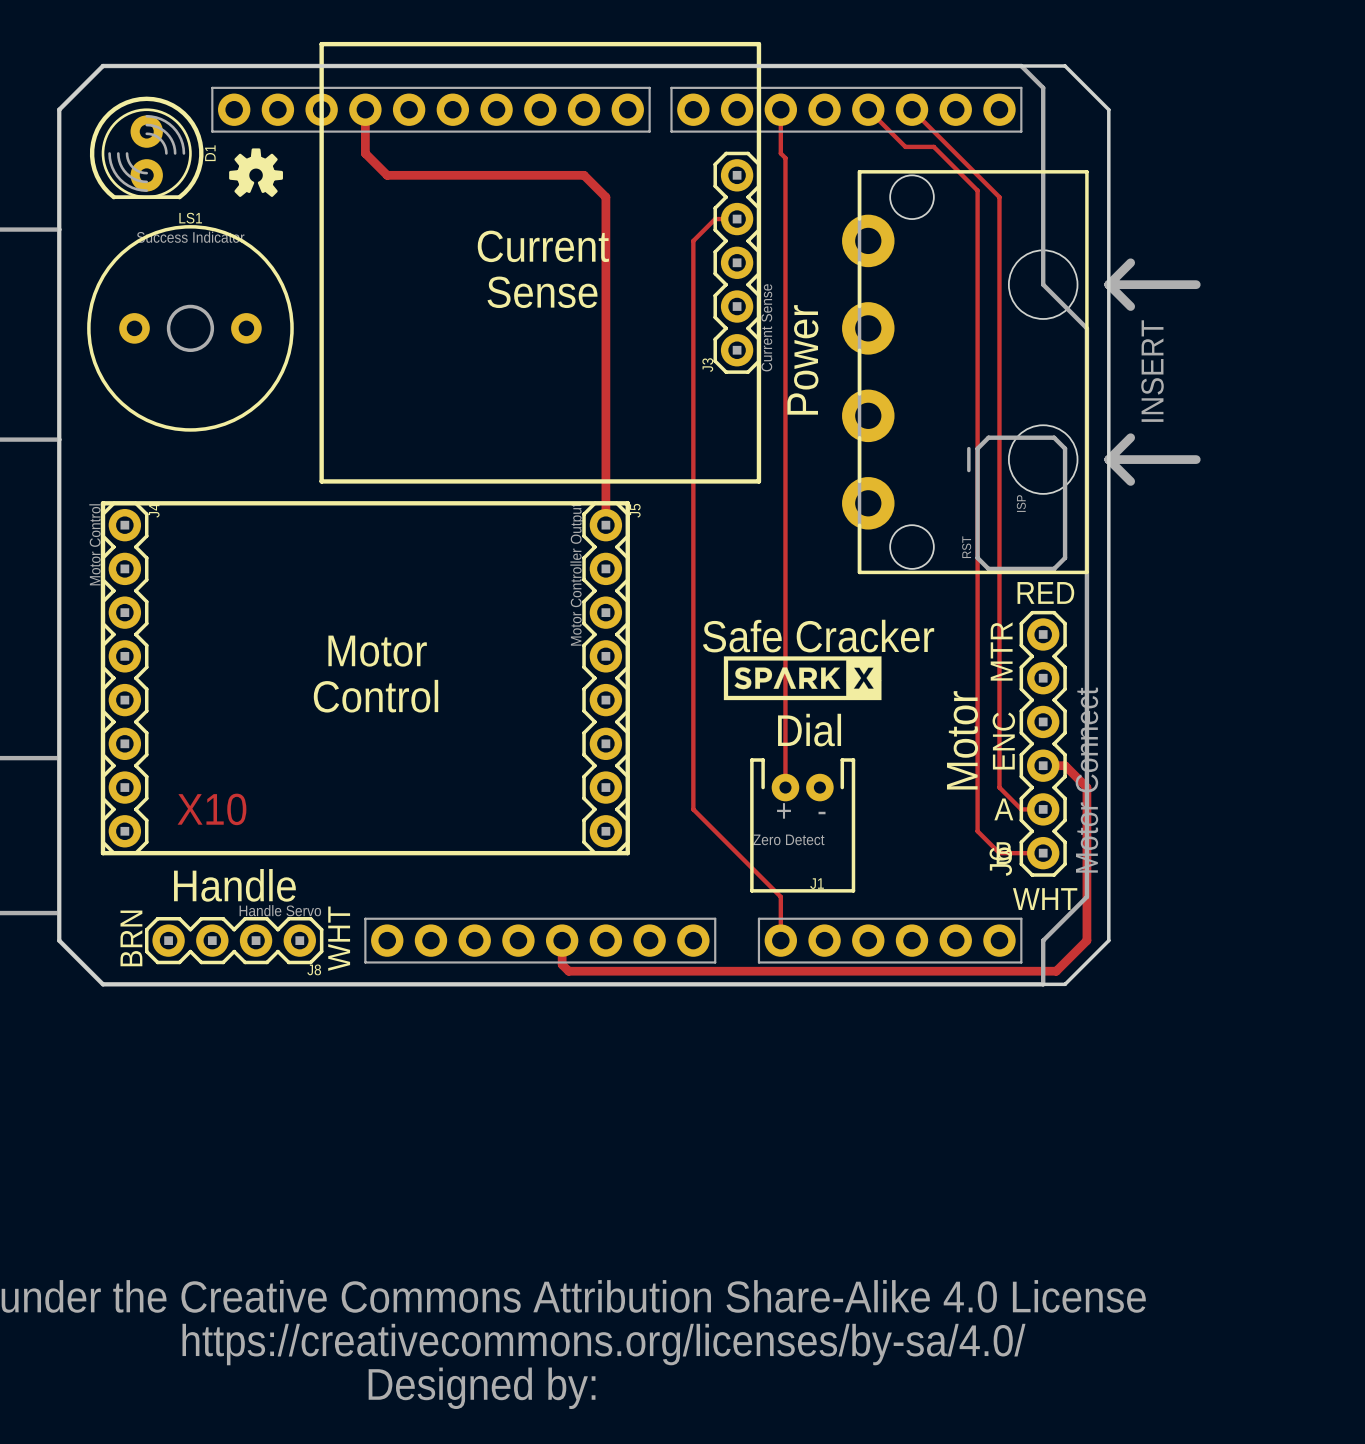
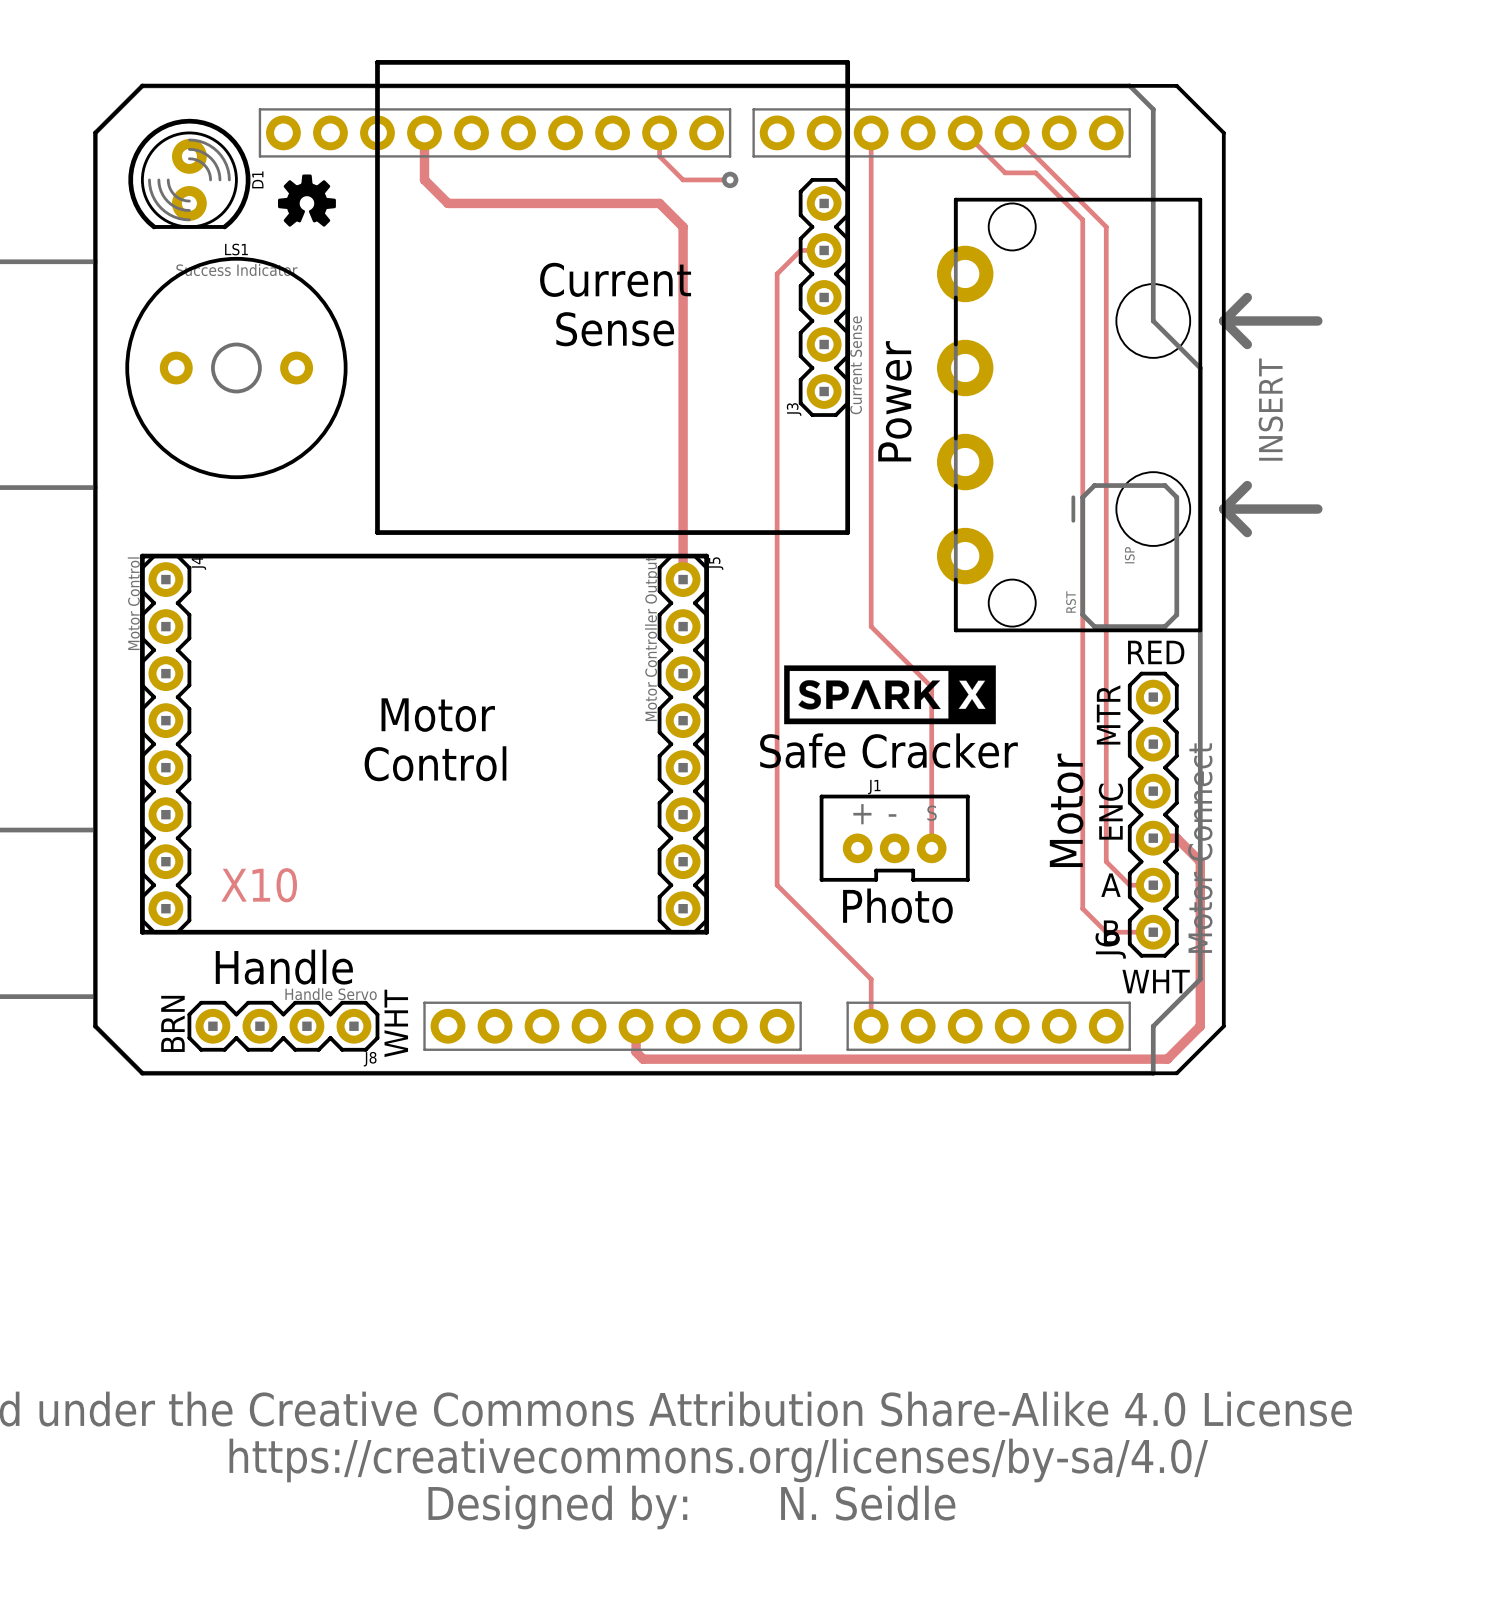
track: none -> (659, 132) (659, 156) (683, 179) (730, 179)
via: none -> (730, 179)
track: (780, 153) (785, 158) (785, 787) -> (871, 179) (871, 626) (931, 687) (931, 848)
drawing: none -> [784, 665, 996, 725]
text position: Safe Cracker (818, 636) -> Safe Cracker (888, 750)
drawing: [723, 656, 882, 701] -> none
text: Dial (809, 730) -> none
J1 footprint: [750, 758, 856, 893] -> [819, 794, 970, 882]
text: none -> Photo (897, 905)
J1 value: Zero Detect (788, 839) -> none
J1 name position: J1 (817, 883) -> J1 (874, 787)
text: none -> N. Seidle (868, 1503)

